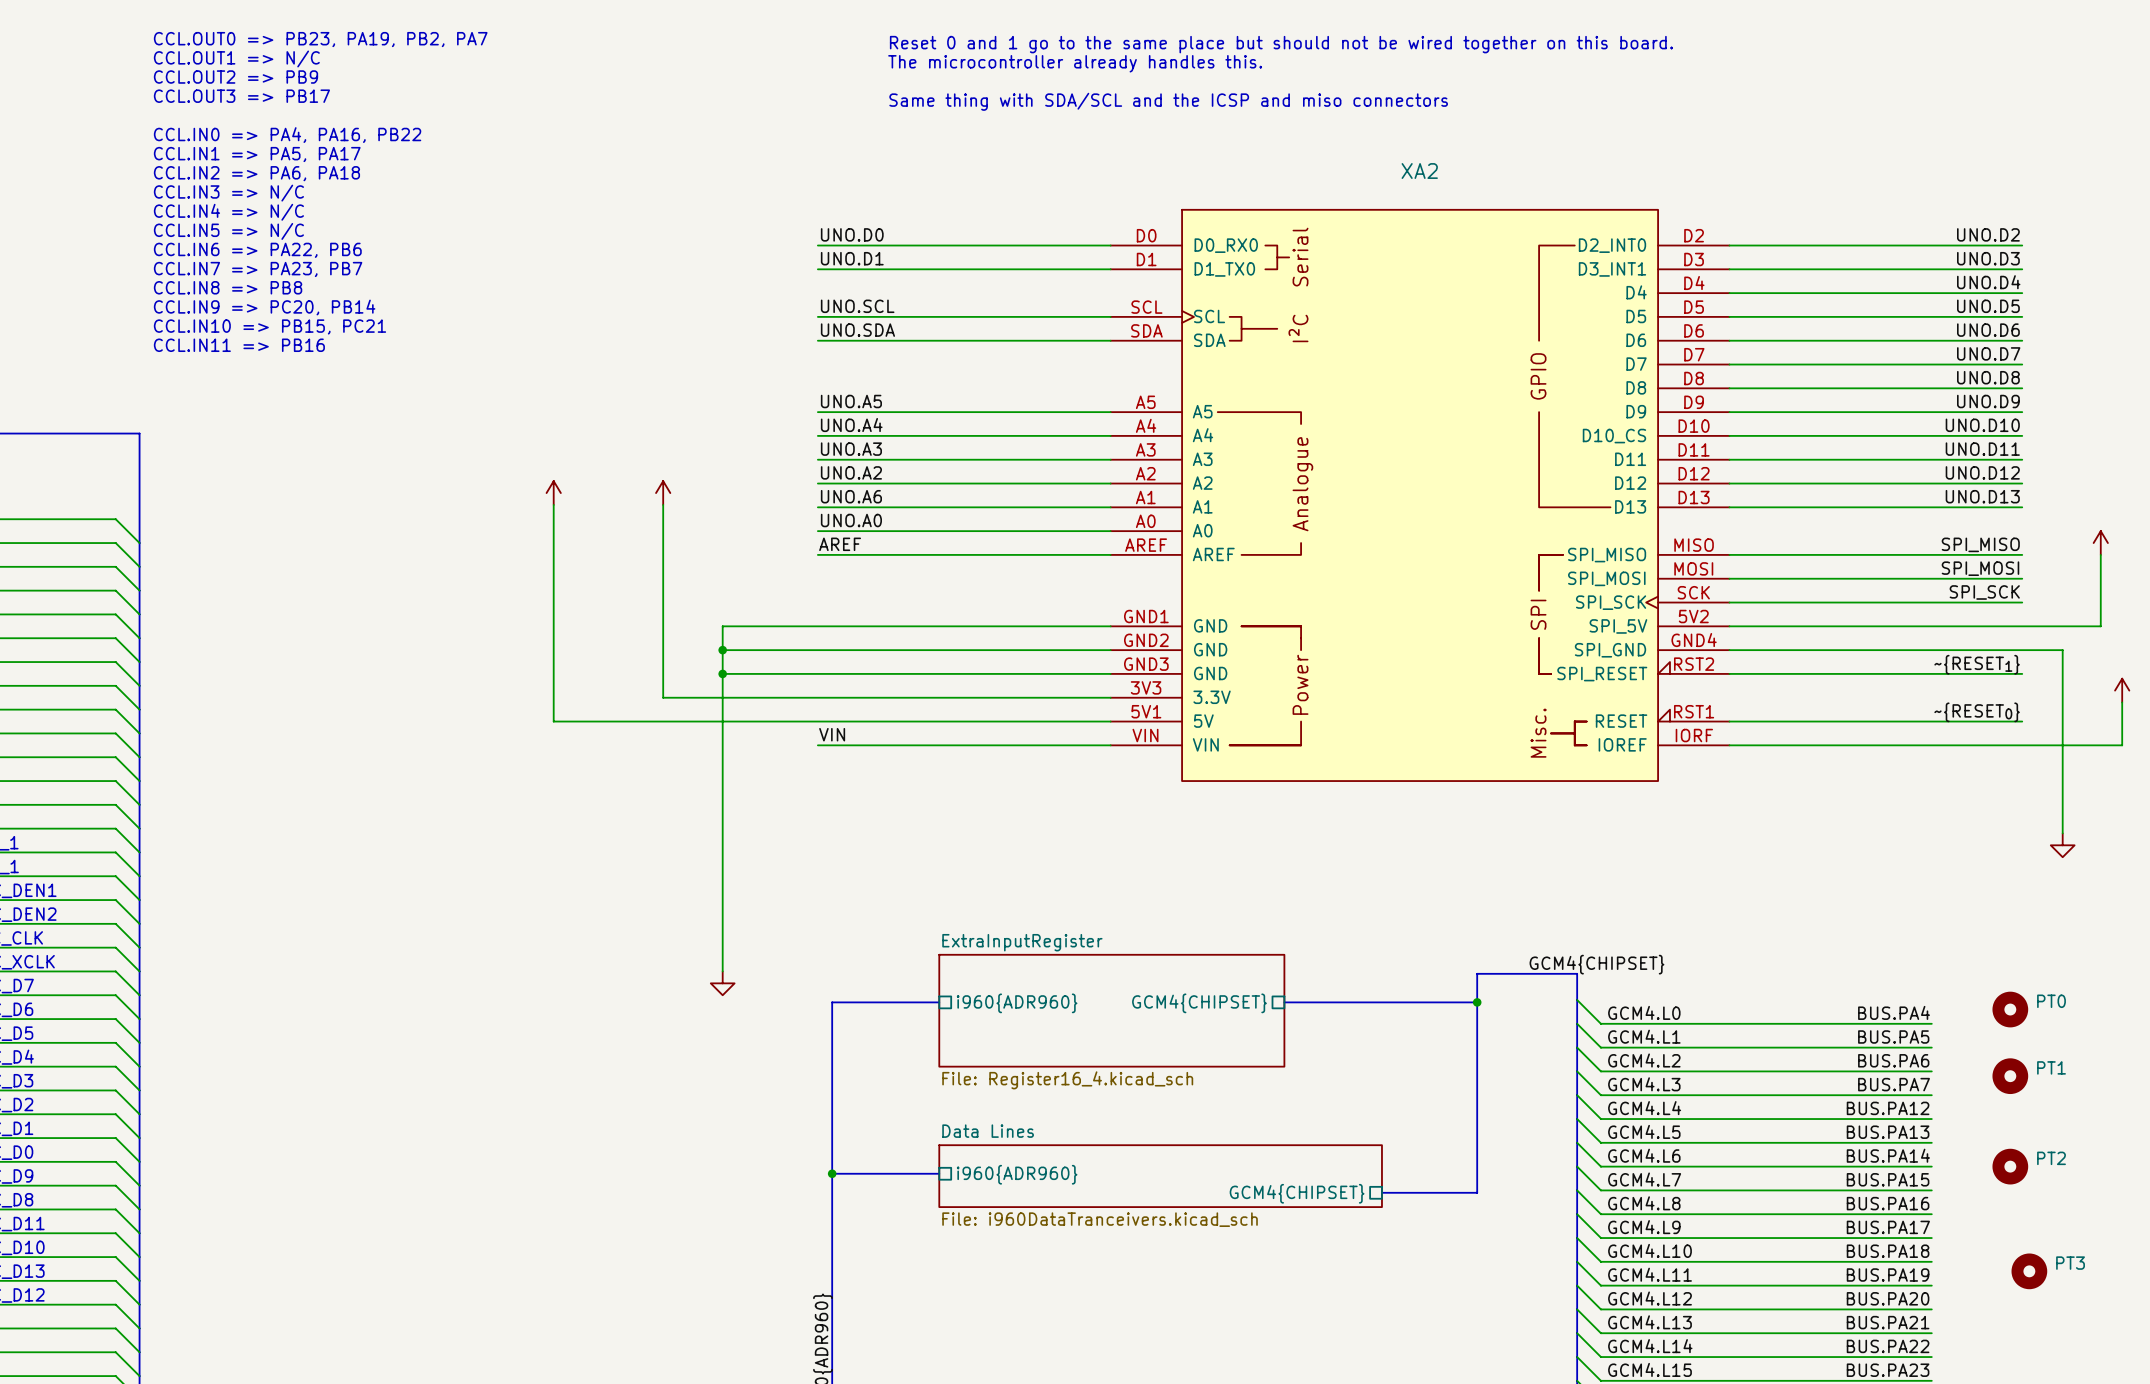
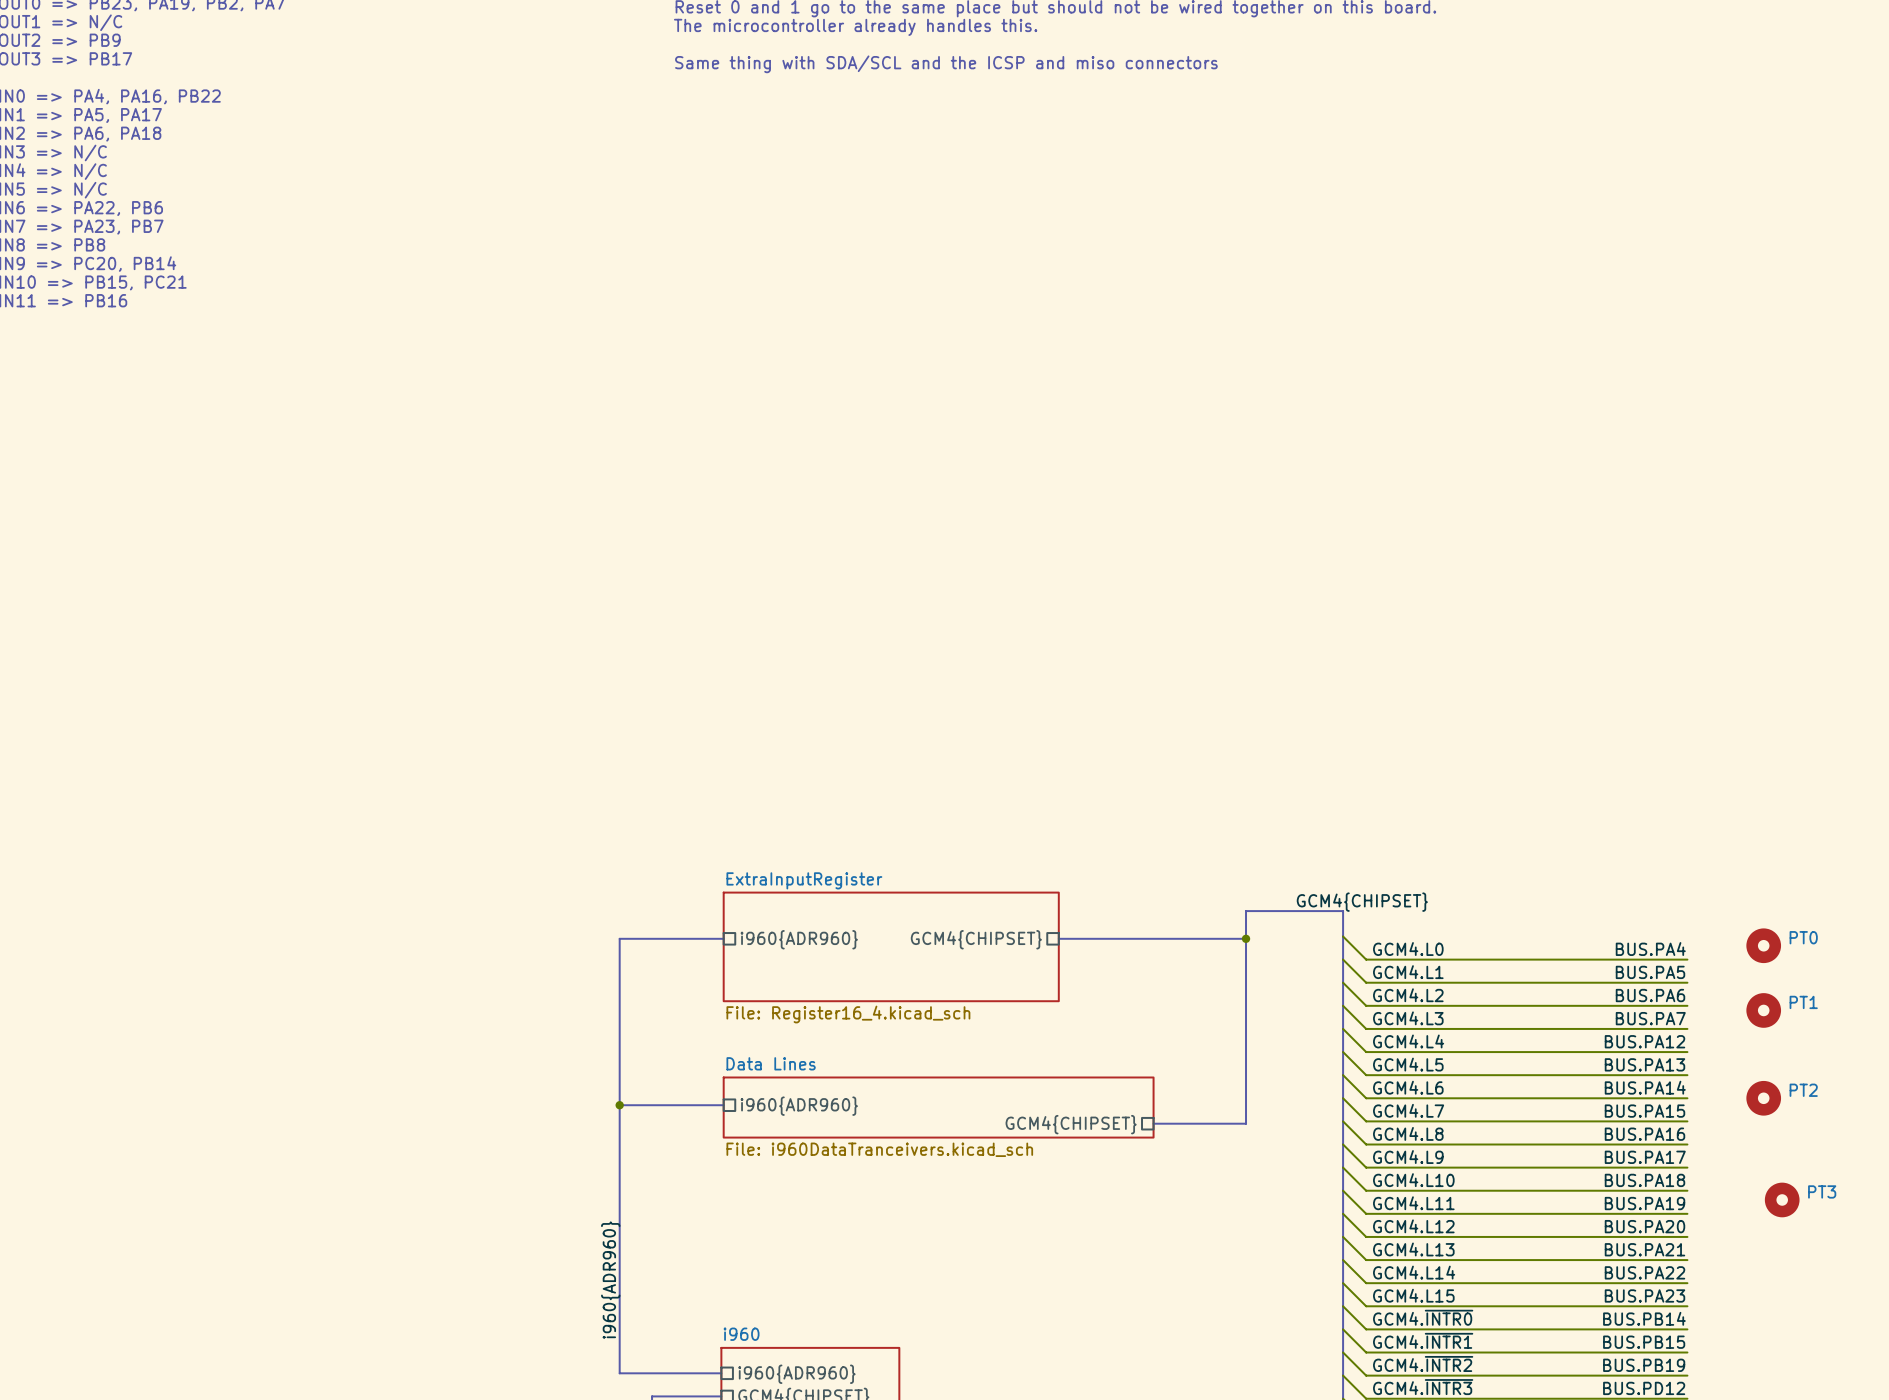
label: UNO.D0 (852, 234) -> none
label: UNO.D2 (1988, 234) -> none
wire: (817, 245) (1110, 245) -> none
wire: (1729, 245) (2022, 245) -> none
label: UNO.D1 (852, 258) -> none
label: UNO.D3 (1988, 258) -> none
wire: (817, 269) (1110, 269) -> none
wire: (1729, 269) (2022, 269) -> none
label: UNO.D4 (1988, 282) -> none
wire: (1729, 293) (2022, 293) -> none
label: UNO.SCL (857, 306) -> none
label: UNO.D5 (1988, 306) -> none
wire: (817, 316) (1110, 316) -> none
wire: (1729, 316) (2022, 316) -> none
label: UNO.SDA (857, 330) -> none
label: UNO.D6 (1988, 330) -> none
wire: (817, 340) (1110, 340) -> none
wire: (1729, 340) (2022, 340) -> none
label: UNO.D7 (1988, 353) -> none
wire: (1729, 364) (2022, 364) -> none
label: UNO.D8 (1988, 377) -> none
wire: (1729, 388) (2022, 388) -> none
label: UNO.A5 (851, 401) -> none
label: UNO.D9 (1988, 401) -> none
wire: (817, 412) (1110, 412) -> none
wire: (1729, 412) (2022, 412) -> none
label: UNO.A4 (851, 425) -> none
label: UNO.D10 (1982, 425) -> none
wire: (817, 435) (1110, 435) -> none
wire: (1729, 435) (2022, 435) -> none
label: UNO.A3 (851, 449) -> none
label: UNO.D11 (1982, 449) -> none
wire: (817, 459) (1110, 459) -> none
wire: (1729, 459) (2022, 459) -> none
label: UNO.A2 (851, 472) -> none
label: UNO.D12 (1982, 472) -> none
wire: (817, 483) (1110, 483) -> none
wire: (1729, 483) (2022, 483) -> none
power symbol: (553, 493) -> none
power symbol: (663, 493) -> none
XA2: (1420, 495) -> none
label: UNO.A6 (851, 496) -> none
label: UNO.D13 (1982, 496) -> none
wire: (553, 504) (553, 721) (1110, 721) -> none
wire: (663, 504) (663, 697) (1110, 697) -> none
wire: (817, 507) (1110, 507) -> none
wire: (1729, 507) (2022, 507) -> none
label: UNO.A0 (851, 520) -> none
wire: (817, 531) (1110, 531) -> none
power symbol: (2100, 543) -> none
label: AREF (840, 544) -> none
label: SPI_MISO (1980, 544) -> none
wire: (817, 554) (1110, 554) -> none
wire: (1729, 554) (2022, 554) -> none
wire: (2100, 554) (2100, 626) (1729, 626) -> none
label: SPI_MOSI (1980, 568) -> none
wire: (1729, 578) (2022, 578) -> none
label: SPI_SCK (1984, 592) -> none
wire: (1729, 602) (2022, 602) -> none
wire: (1110, 626) (722, 626) (722, 971) -> none
wire: (722, 650) (1110, 650) -> none
junction: (722, 650) -> none
wire: (1729, 650) (2062, 650) (2062, 833) -> none
label: ~{RESET1} (1977, 664) -> none
wire: (722, 673) (1110, 673) -> none
junction: (722, 673) -> none
wire: (1729, 673) (2022, 673) -> none
power symbol: (2122, 690) -> none
wire: (2122, 702) (2122, 745) (1729, 745) -> none
label: ~{RESET0} (1977, 712) -> none
wire: (1729, 721) (2022, 721) -> none
label: VIN (832, 734) -> none
wire: (817, 745) (1110, 745) -> none
power symbol: (2062, 845) -> none
power symbol: (722, 983) -> none

